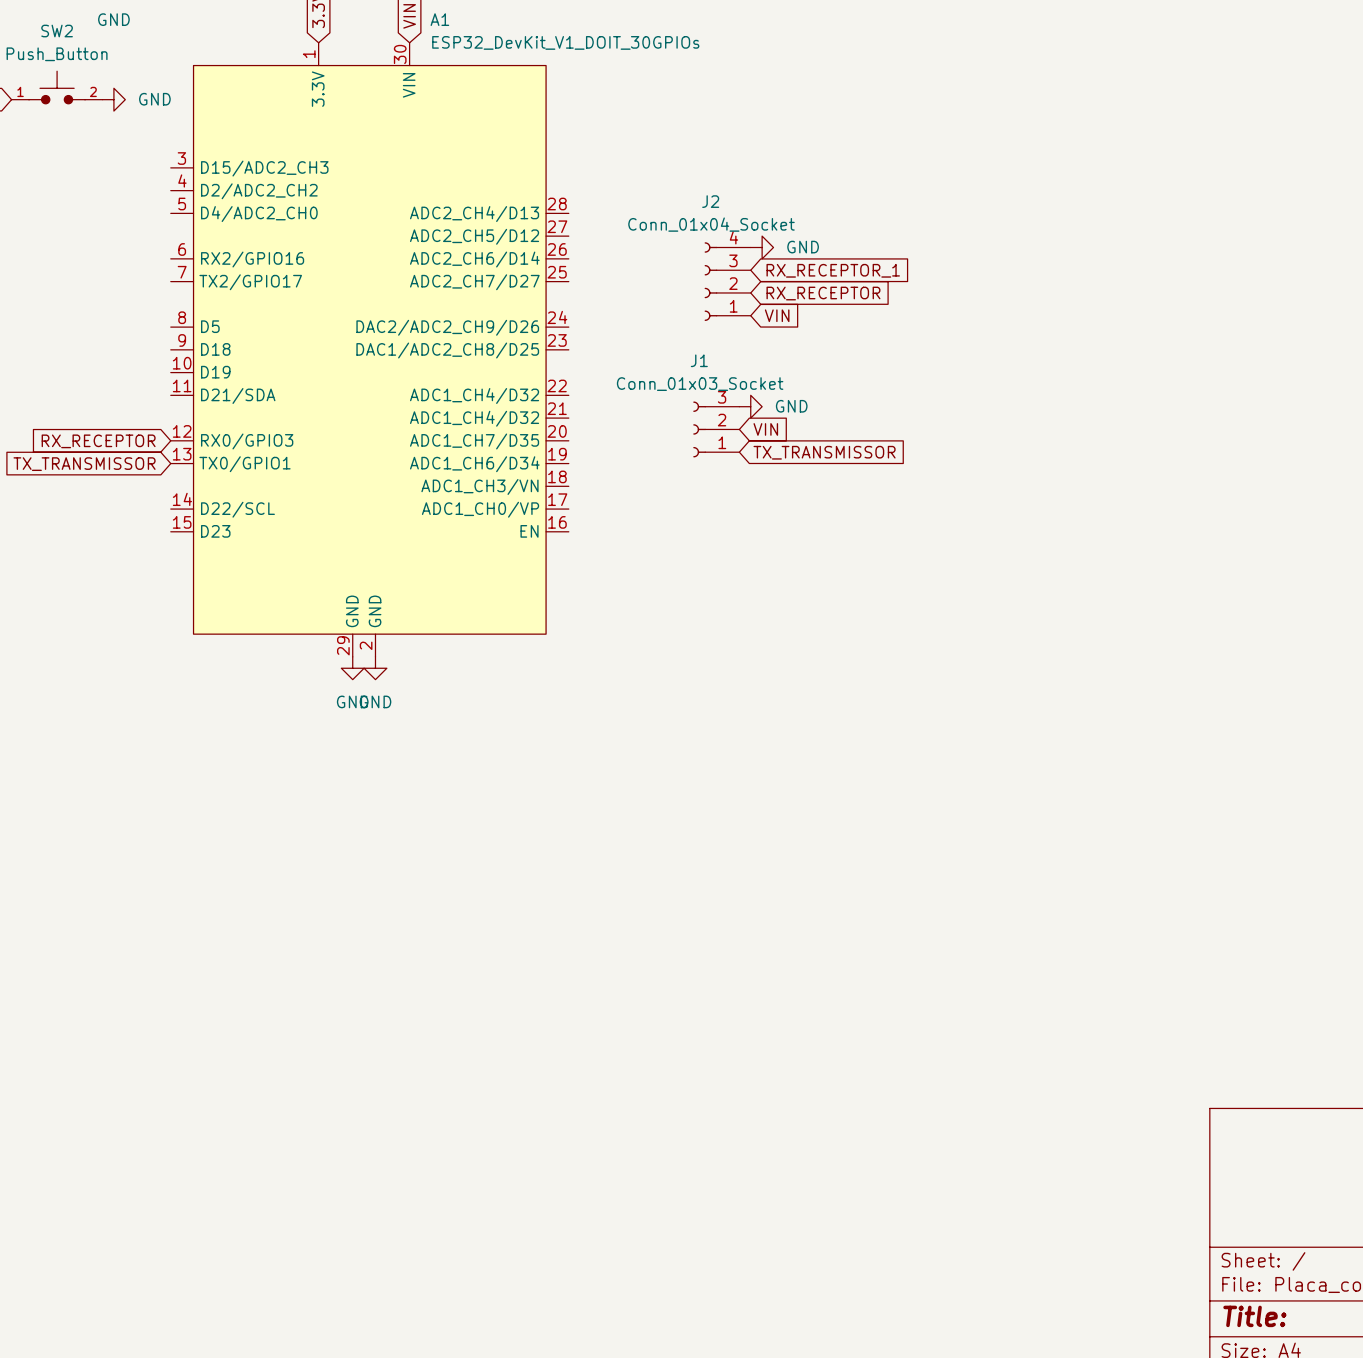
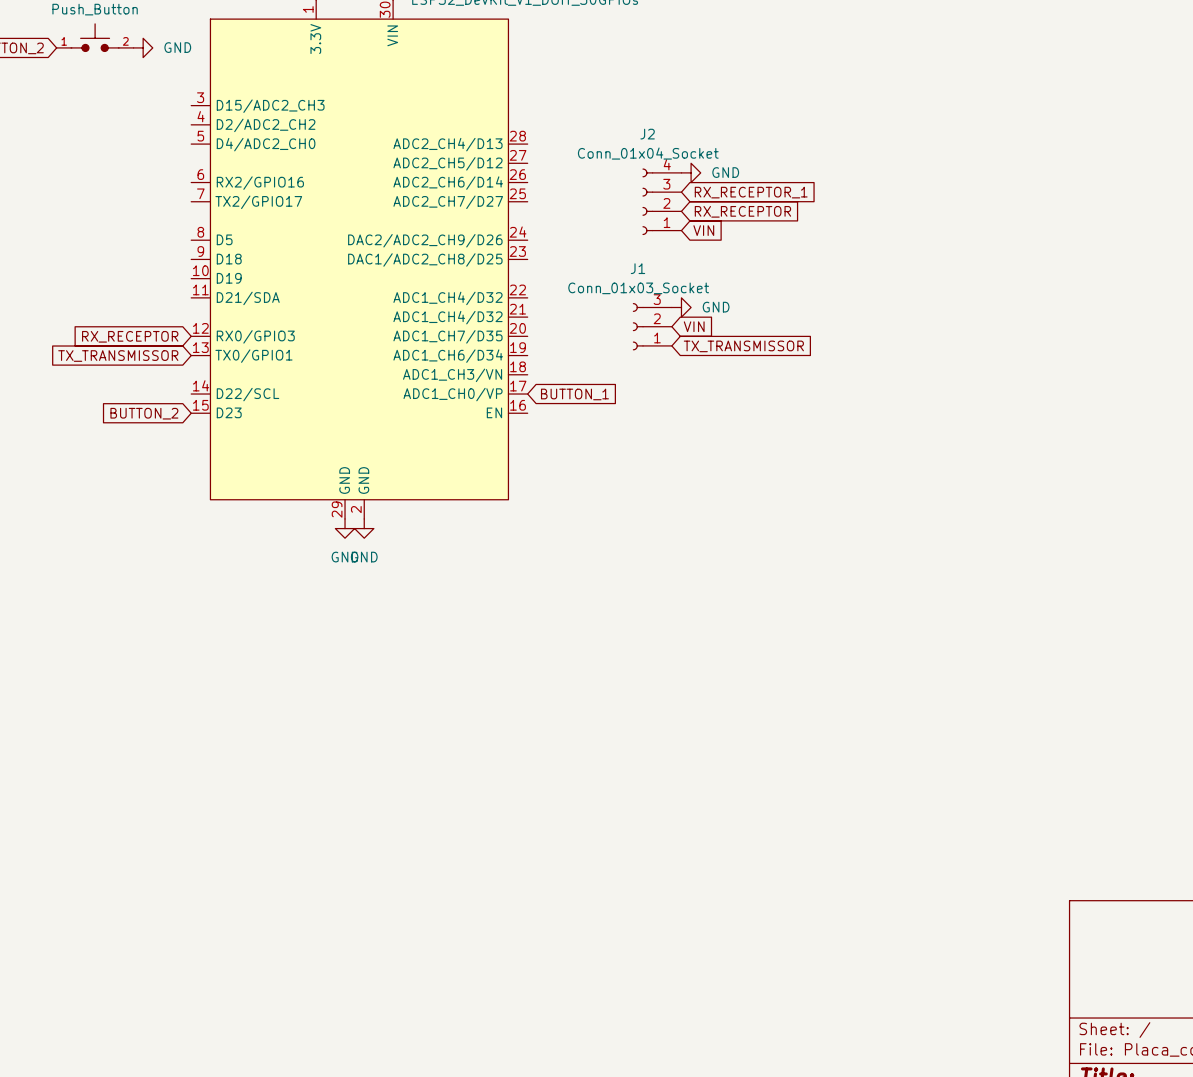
global label: none -> BUTTON_1 (574, 394)
global label: none -> BUTTON_2 (144, 413)

